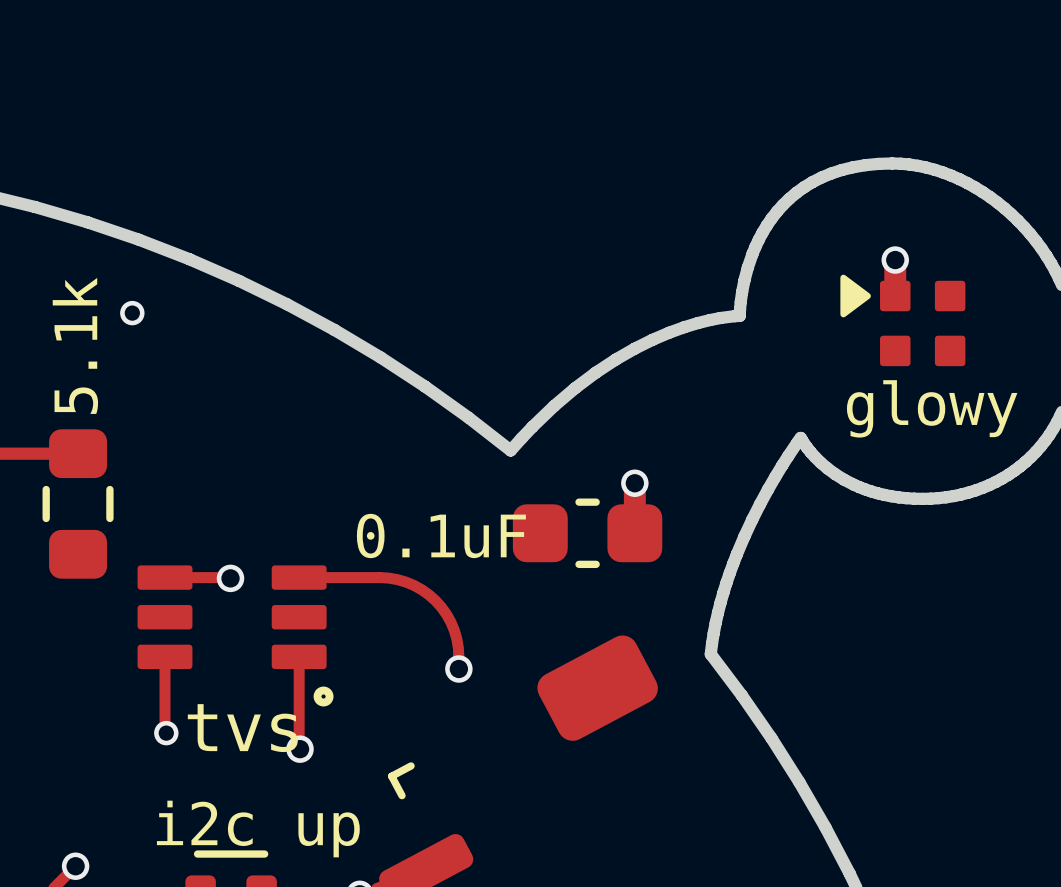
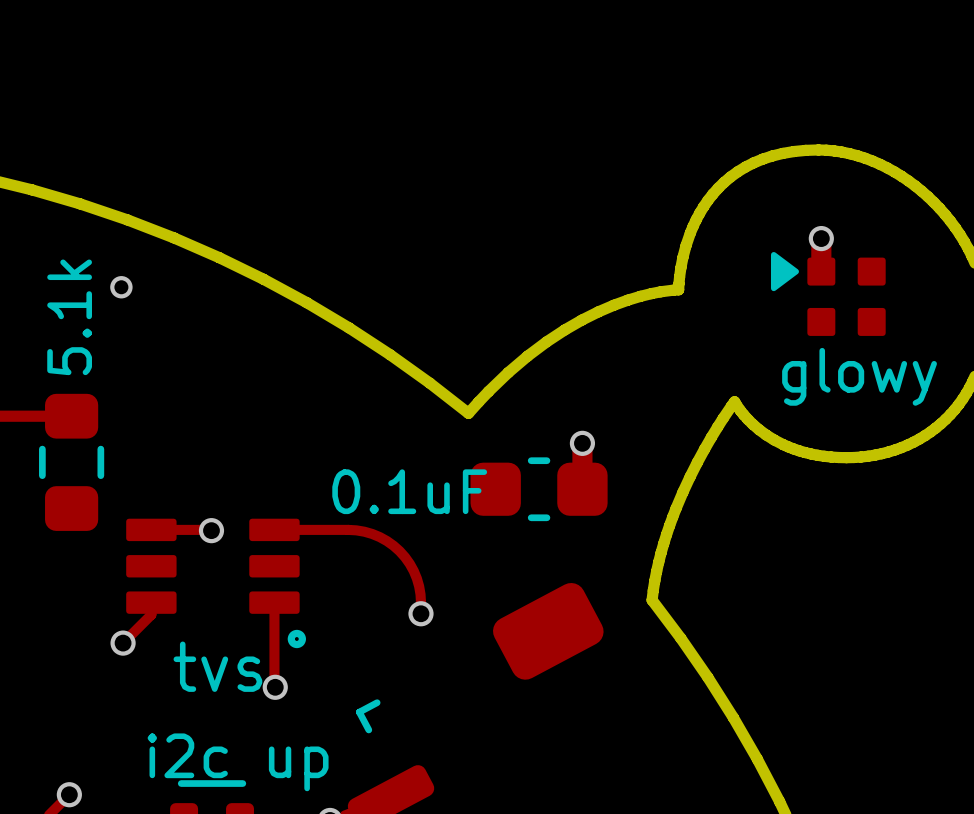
track: (165, 670) (166, 733) -> (151, 614) (123, 643)
via: none -> (123, 643)
via: (166, 733) -> none

